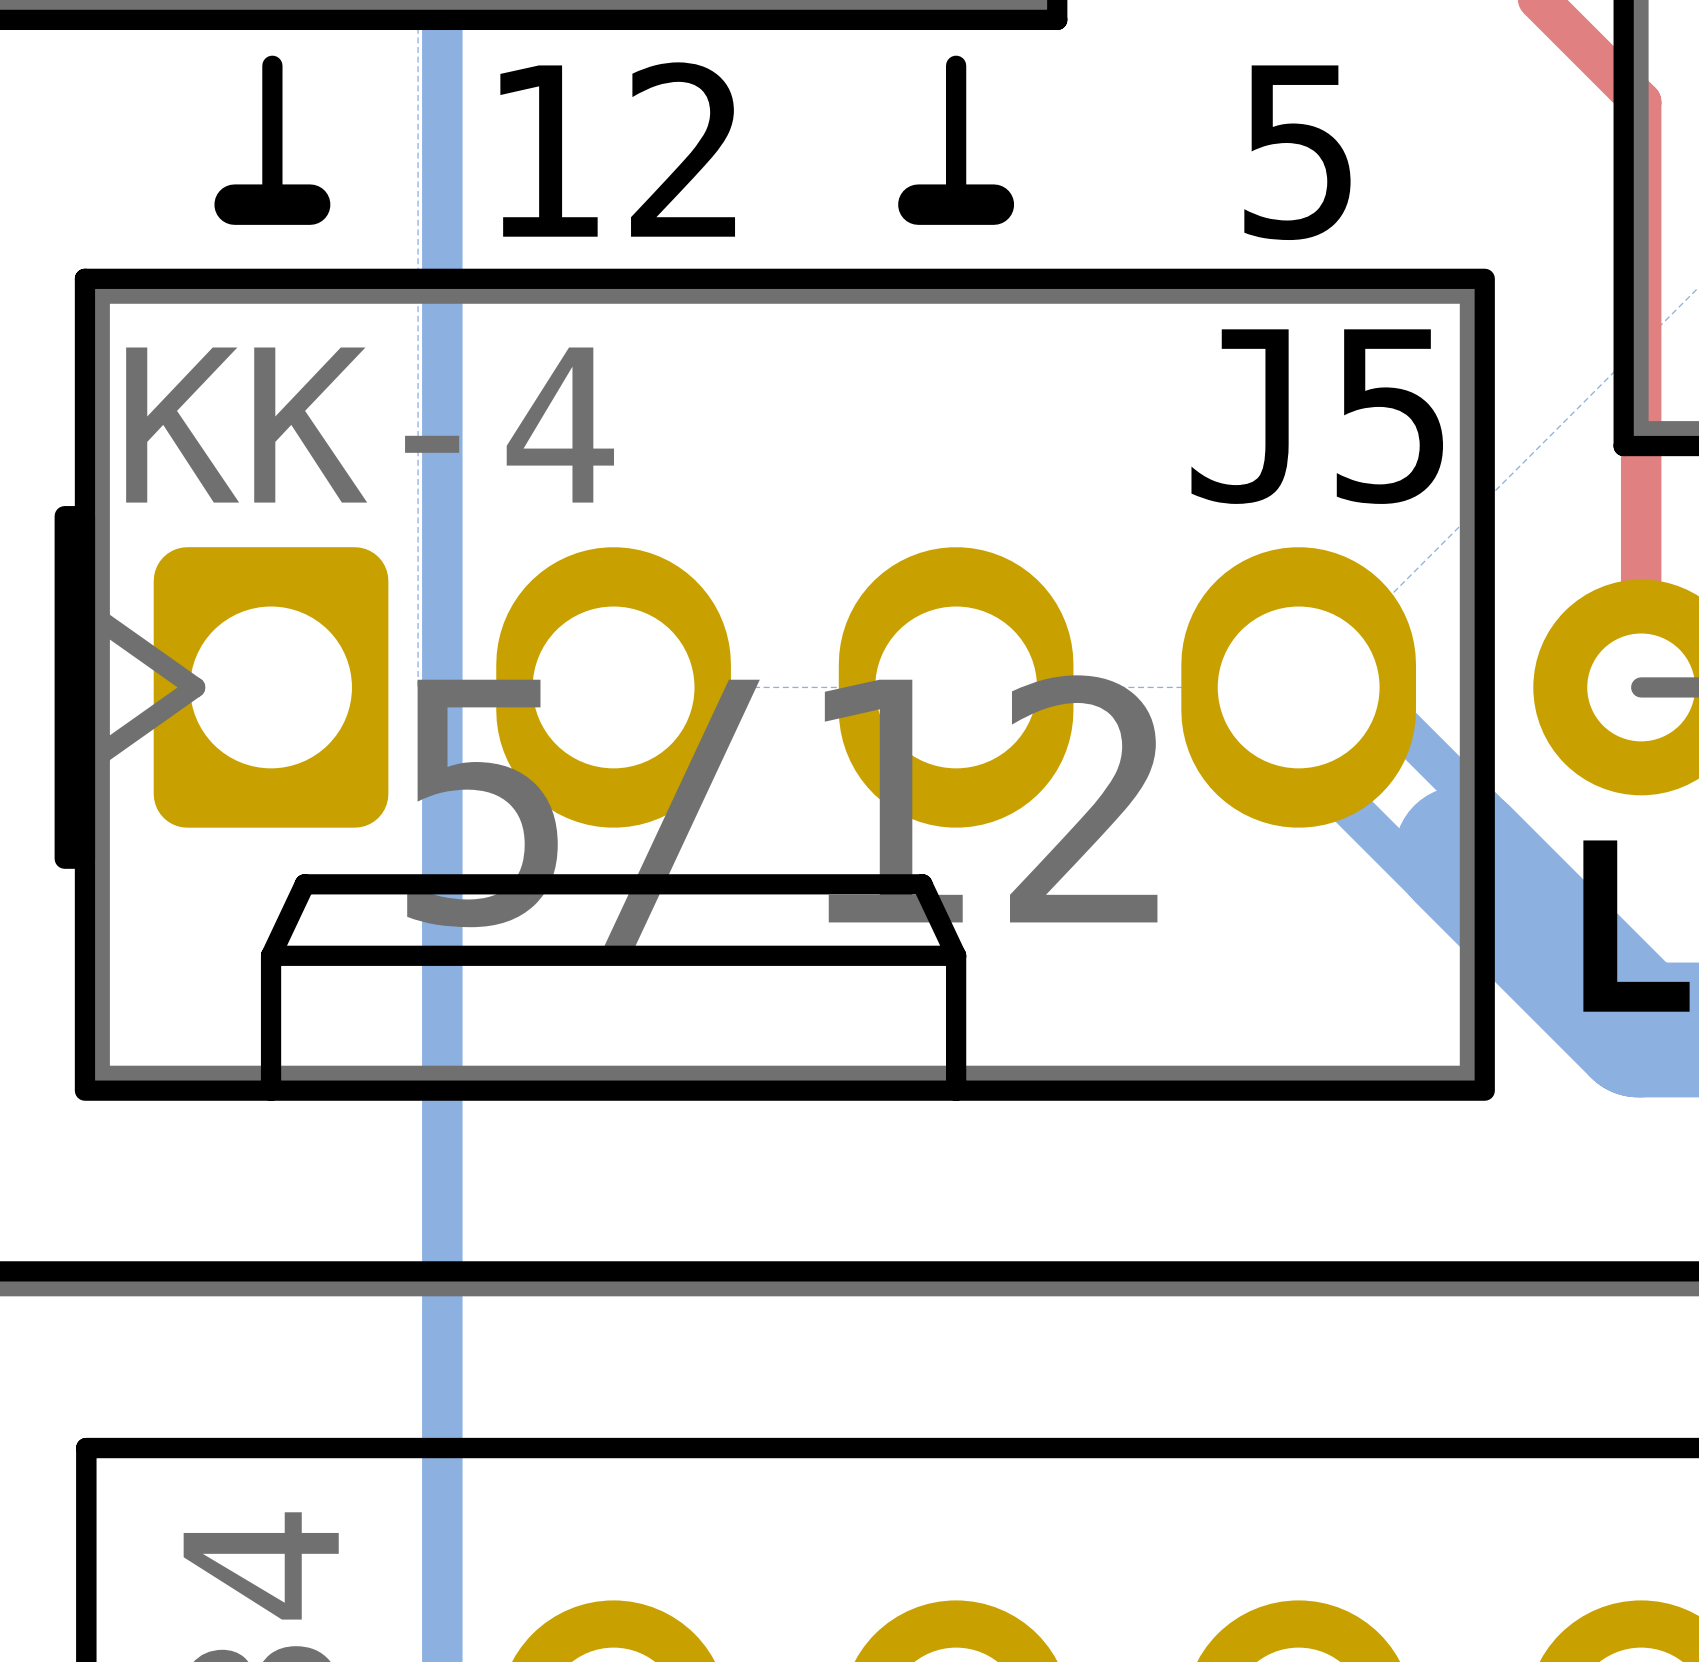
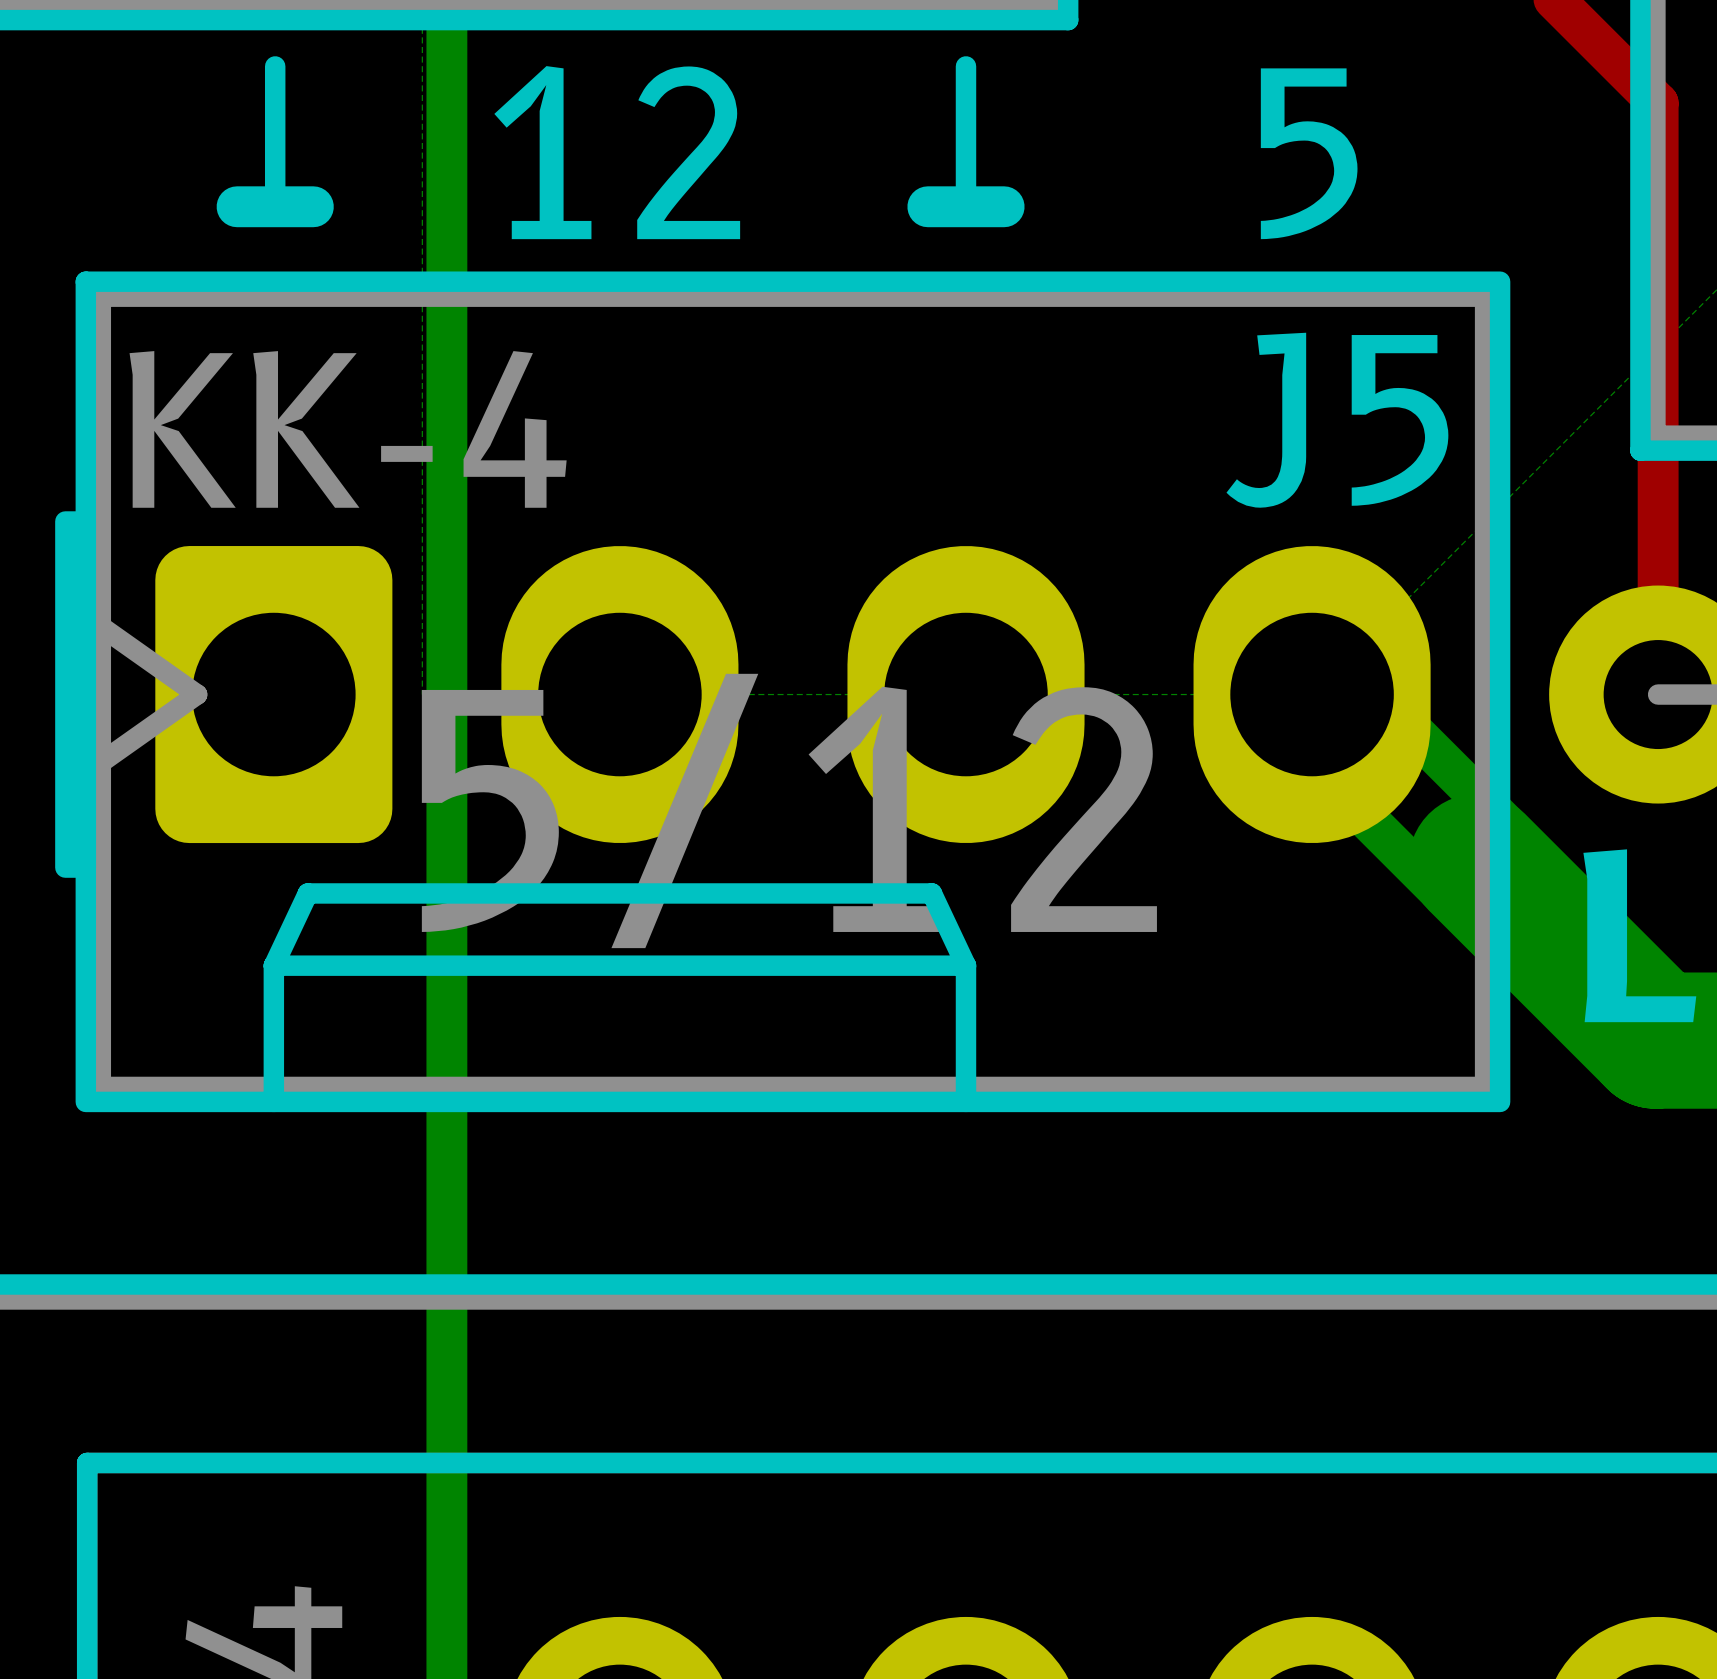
J5 footprint: [54, 268, 1495, 1101] -> [55, 271, 1511, 1113]

